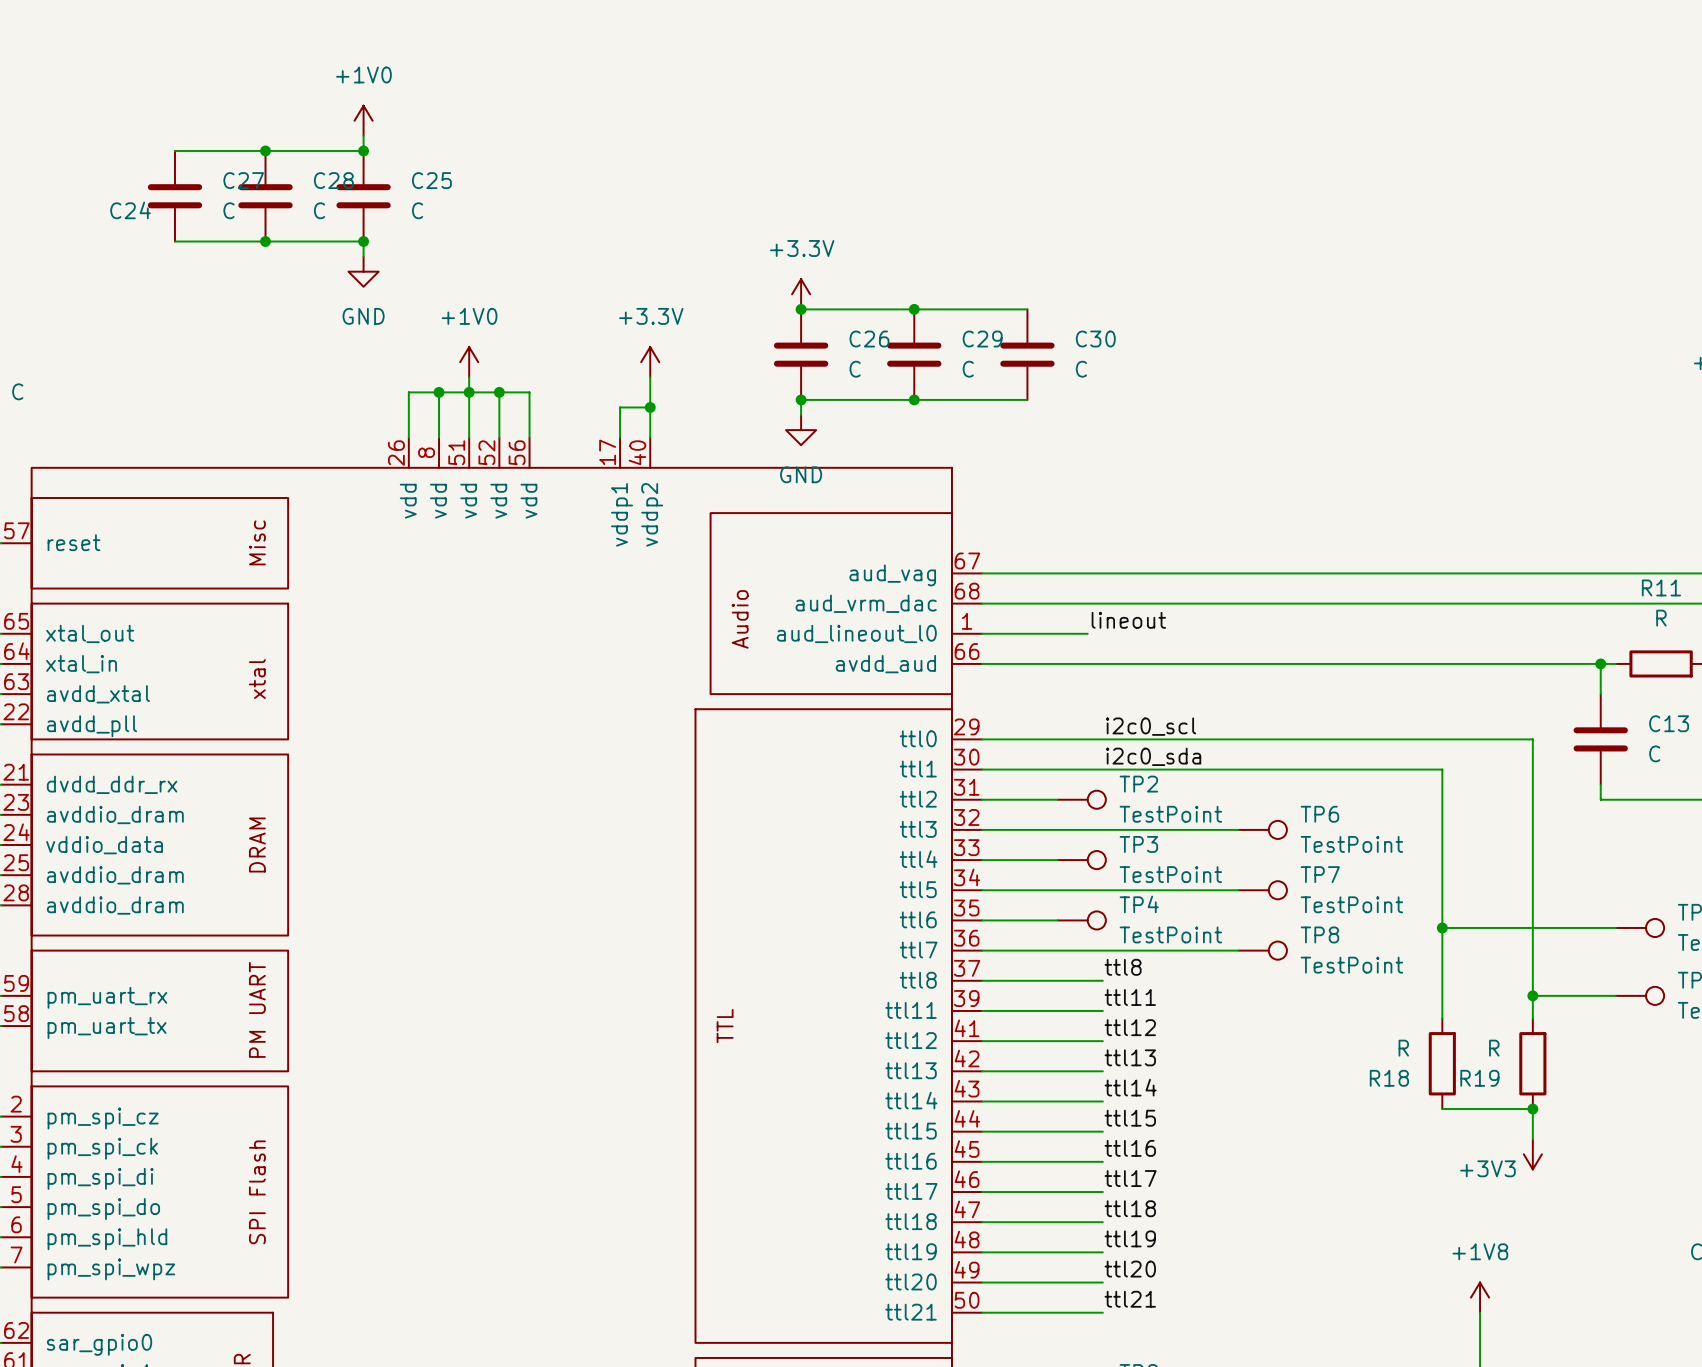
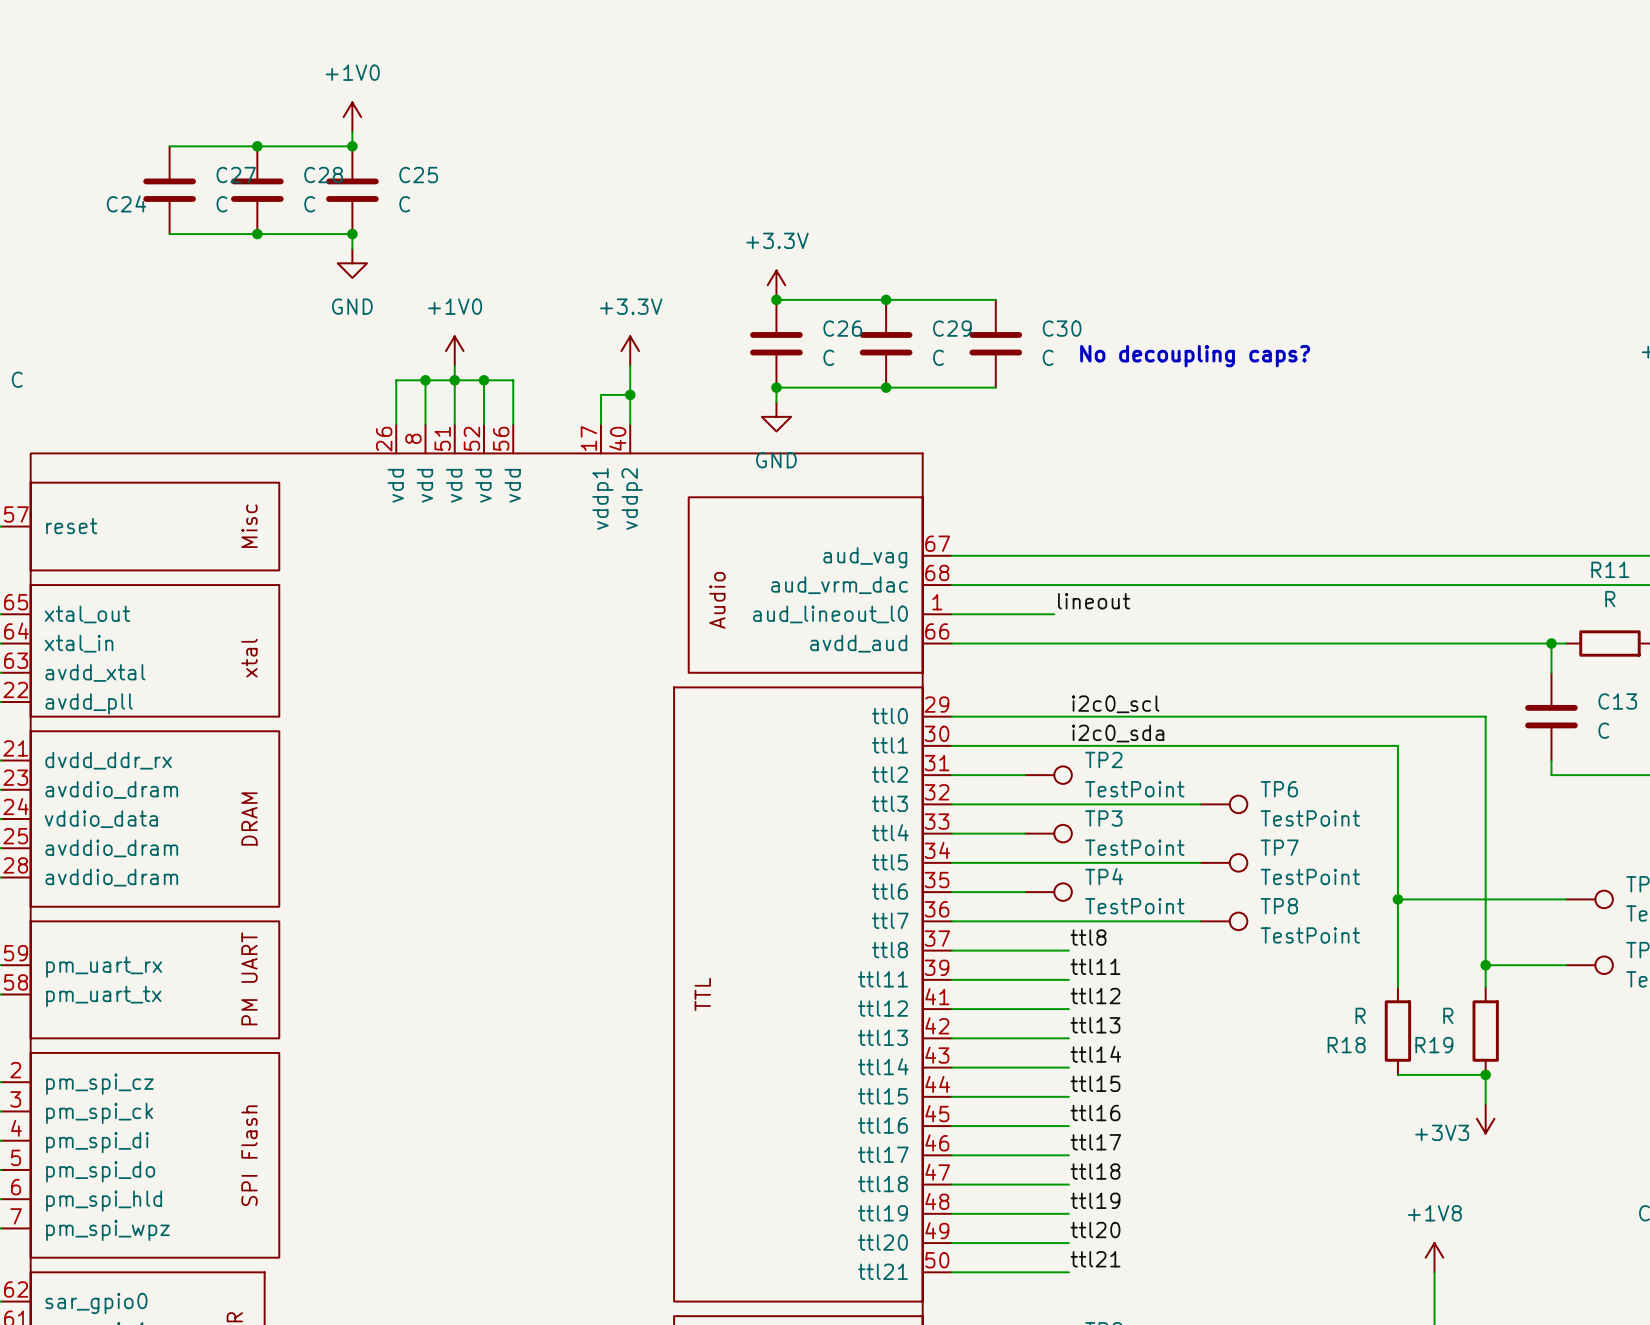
text: none -> No decoupling caps? (1195, 356)

